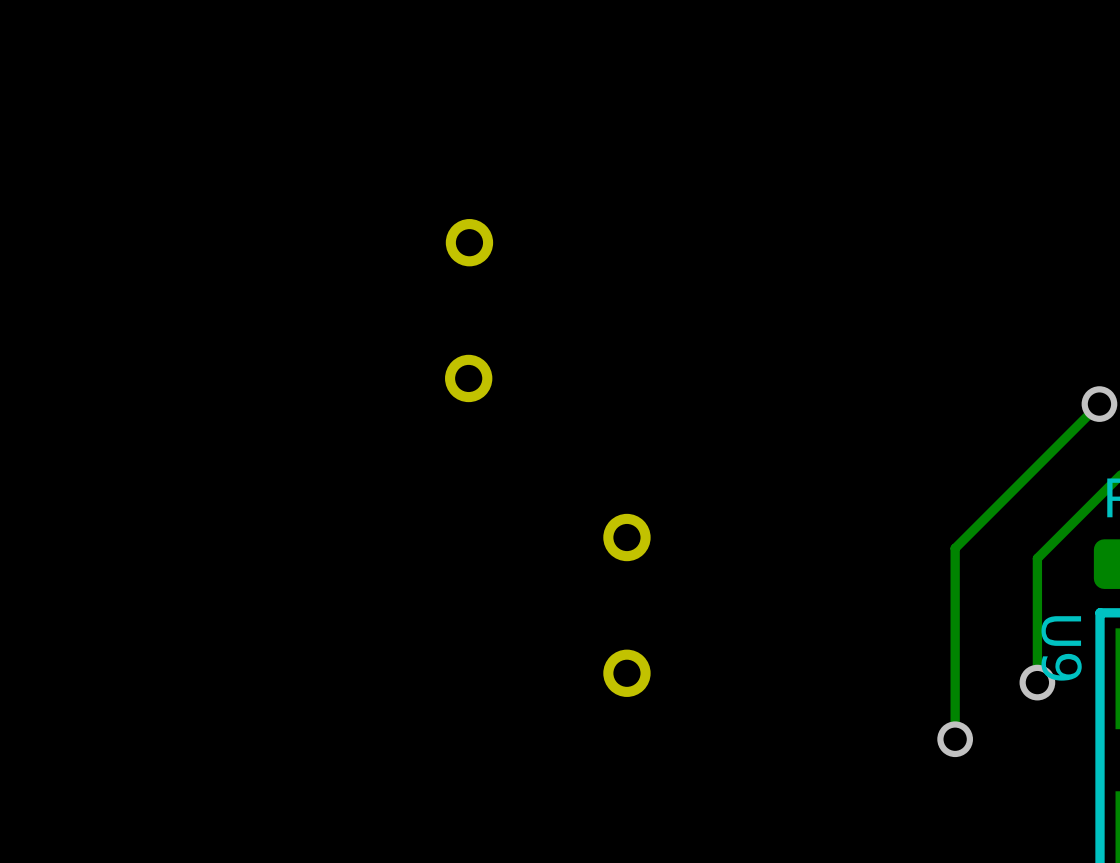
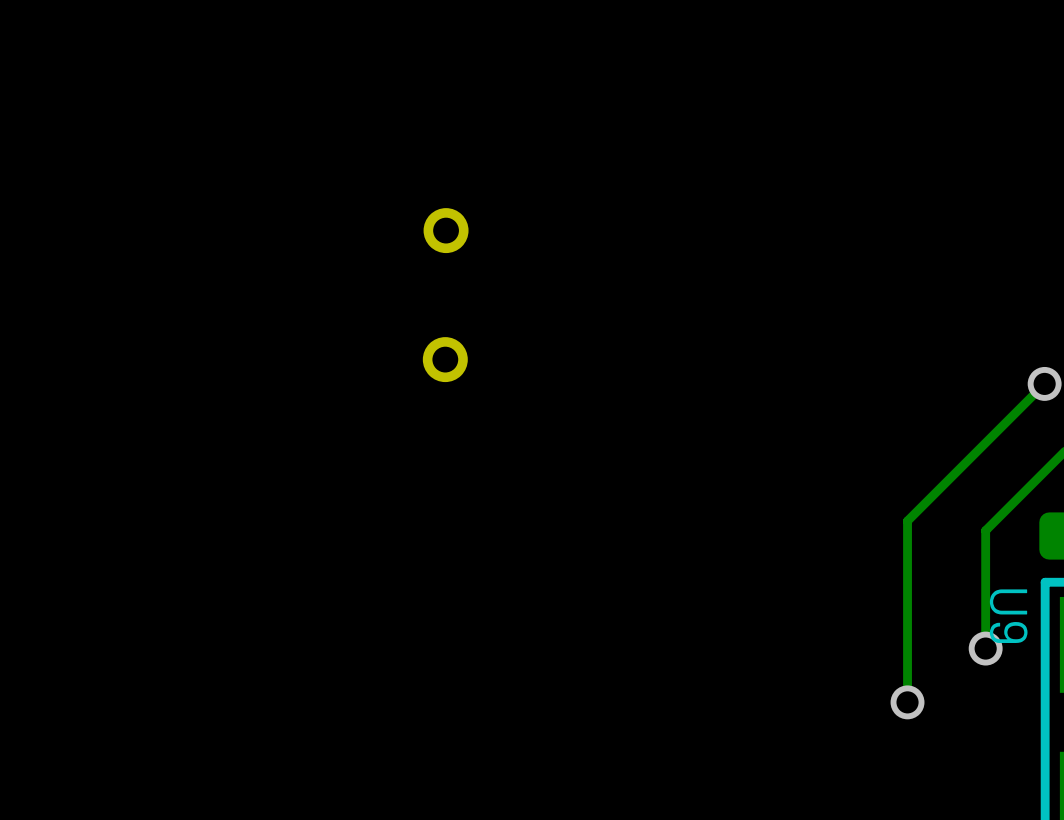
part: (626, 537) -> none
part: (626, 673) -> none

